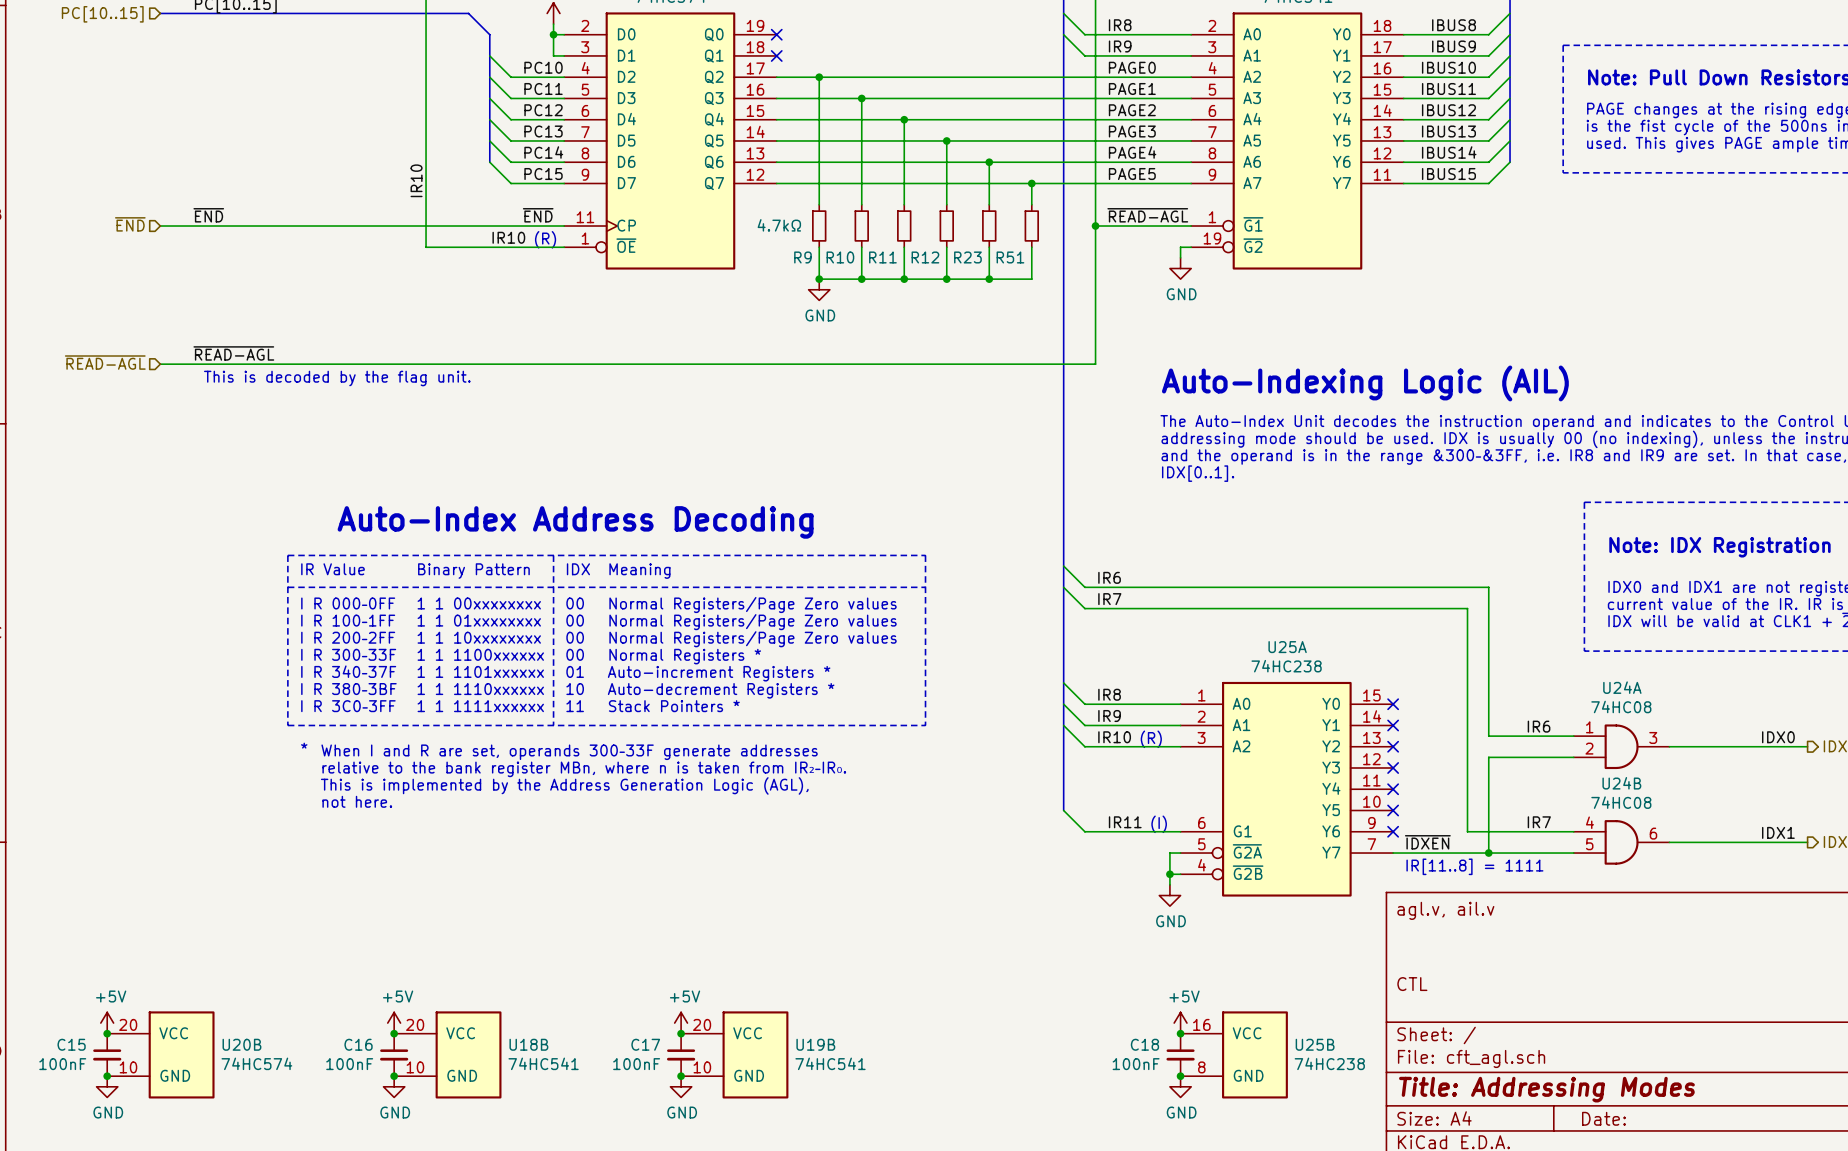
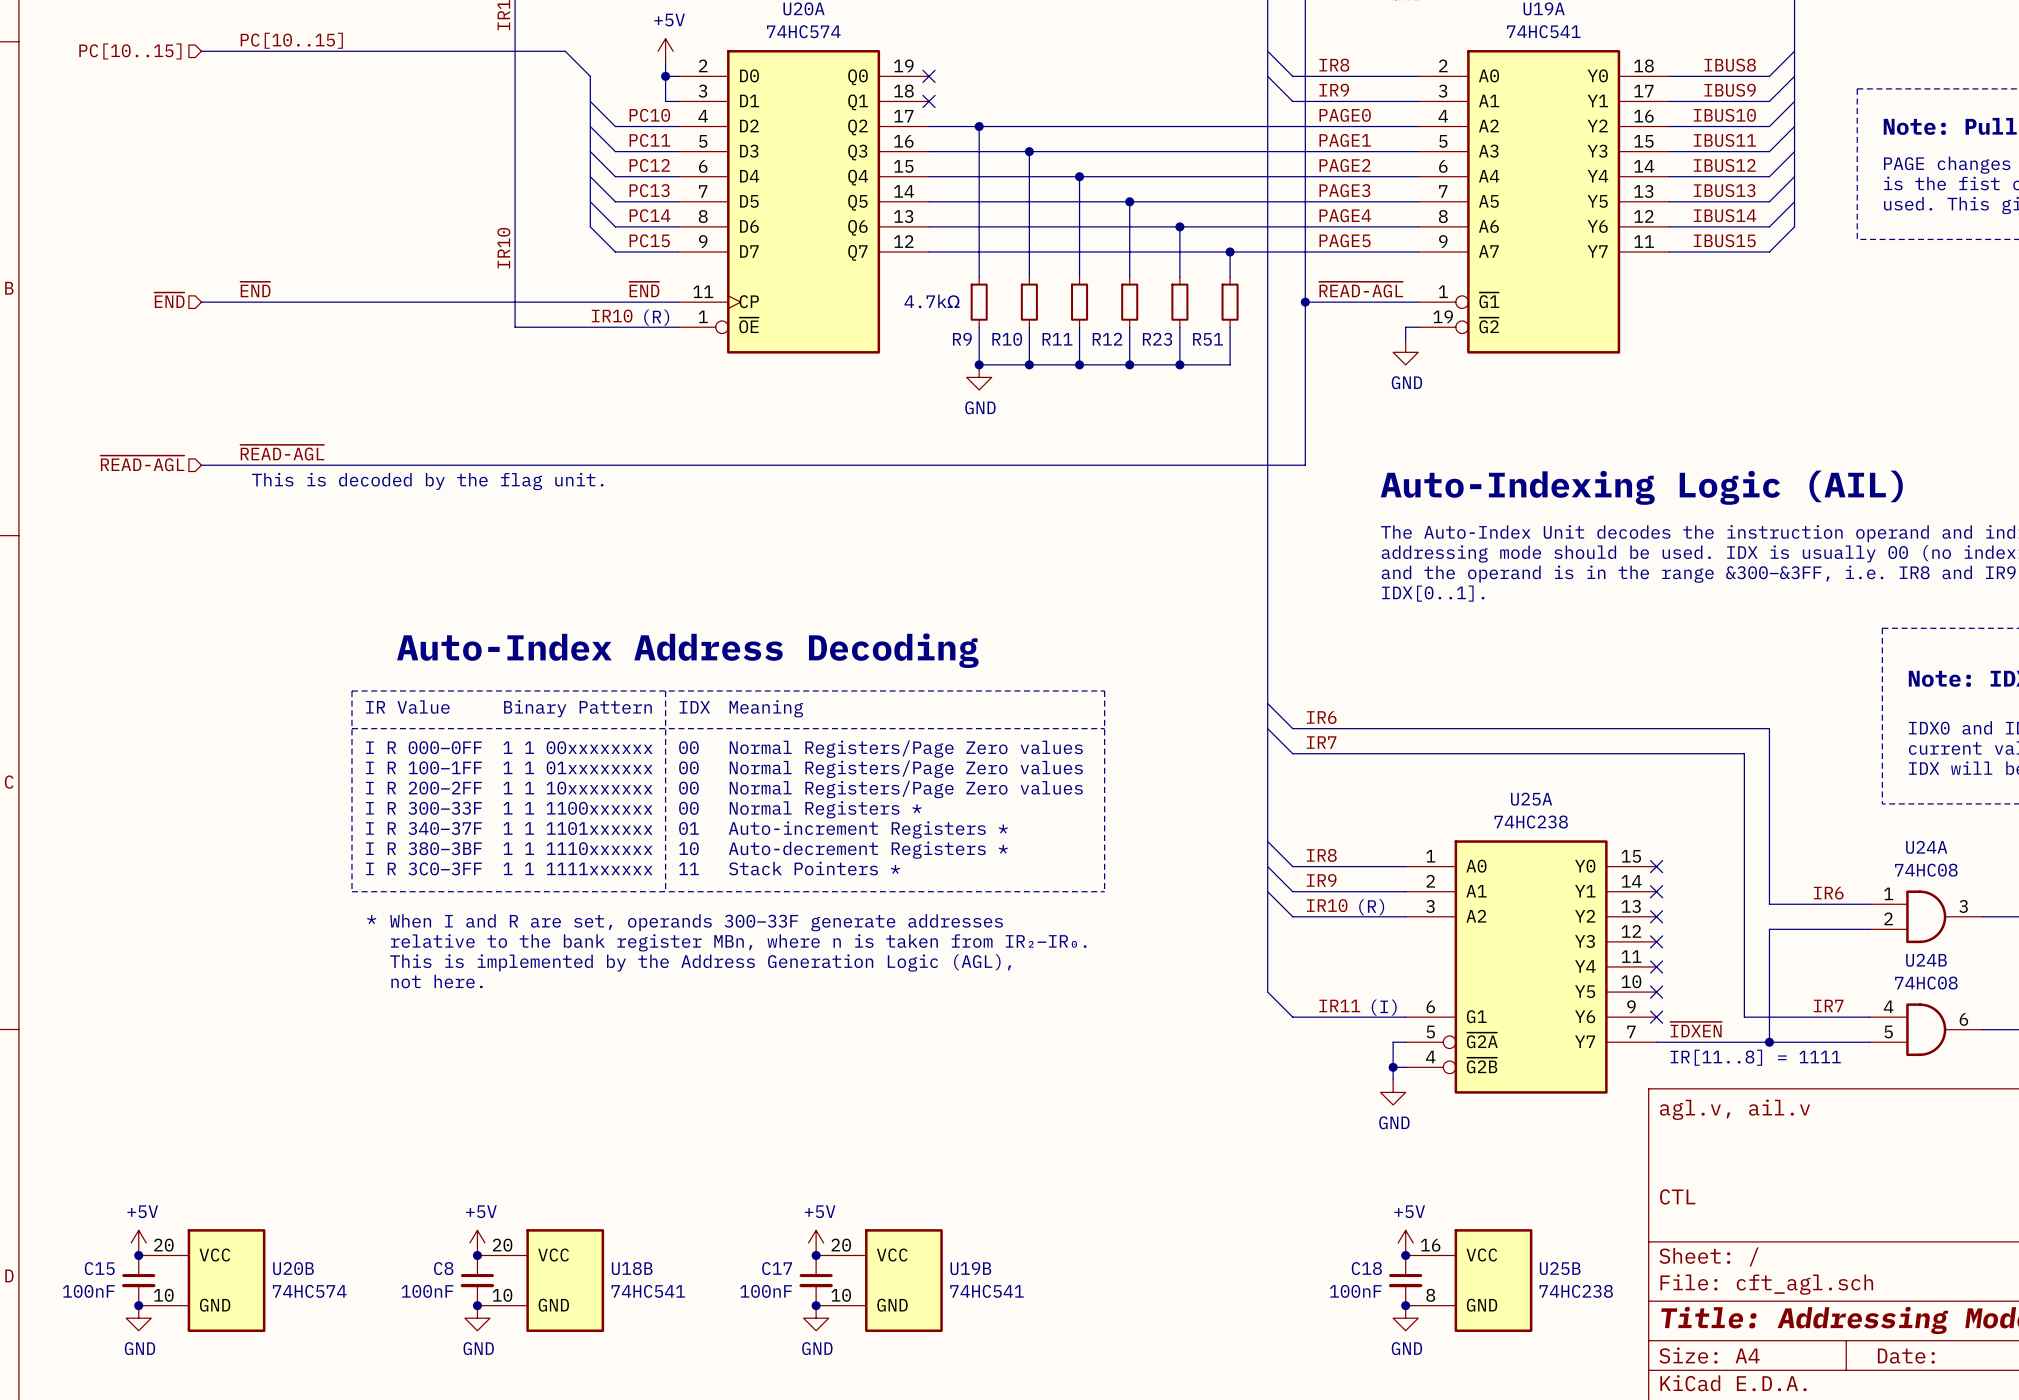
C16 name: C16 (358, 1044) -> C8 (443, 1268)

